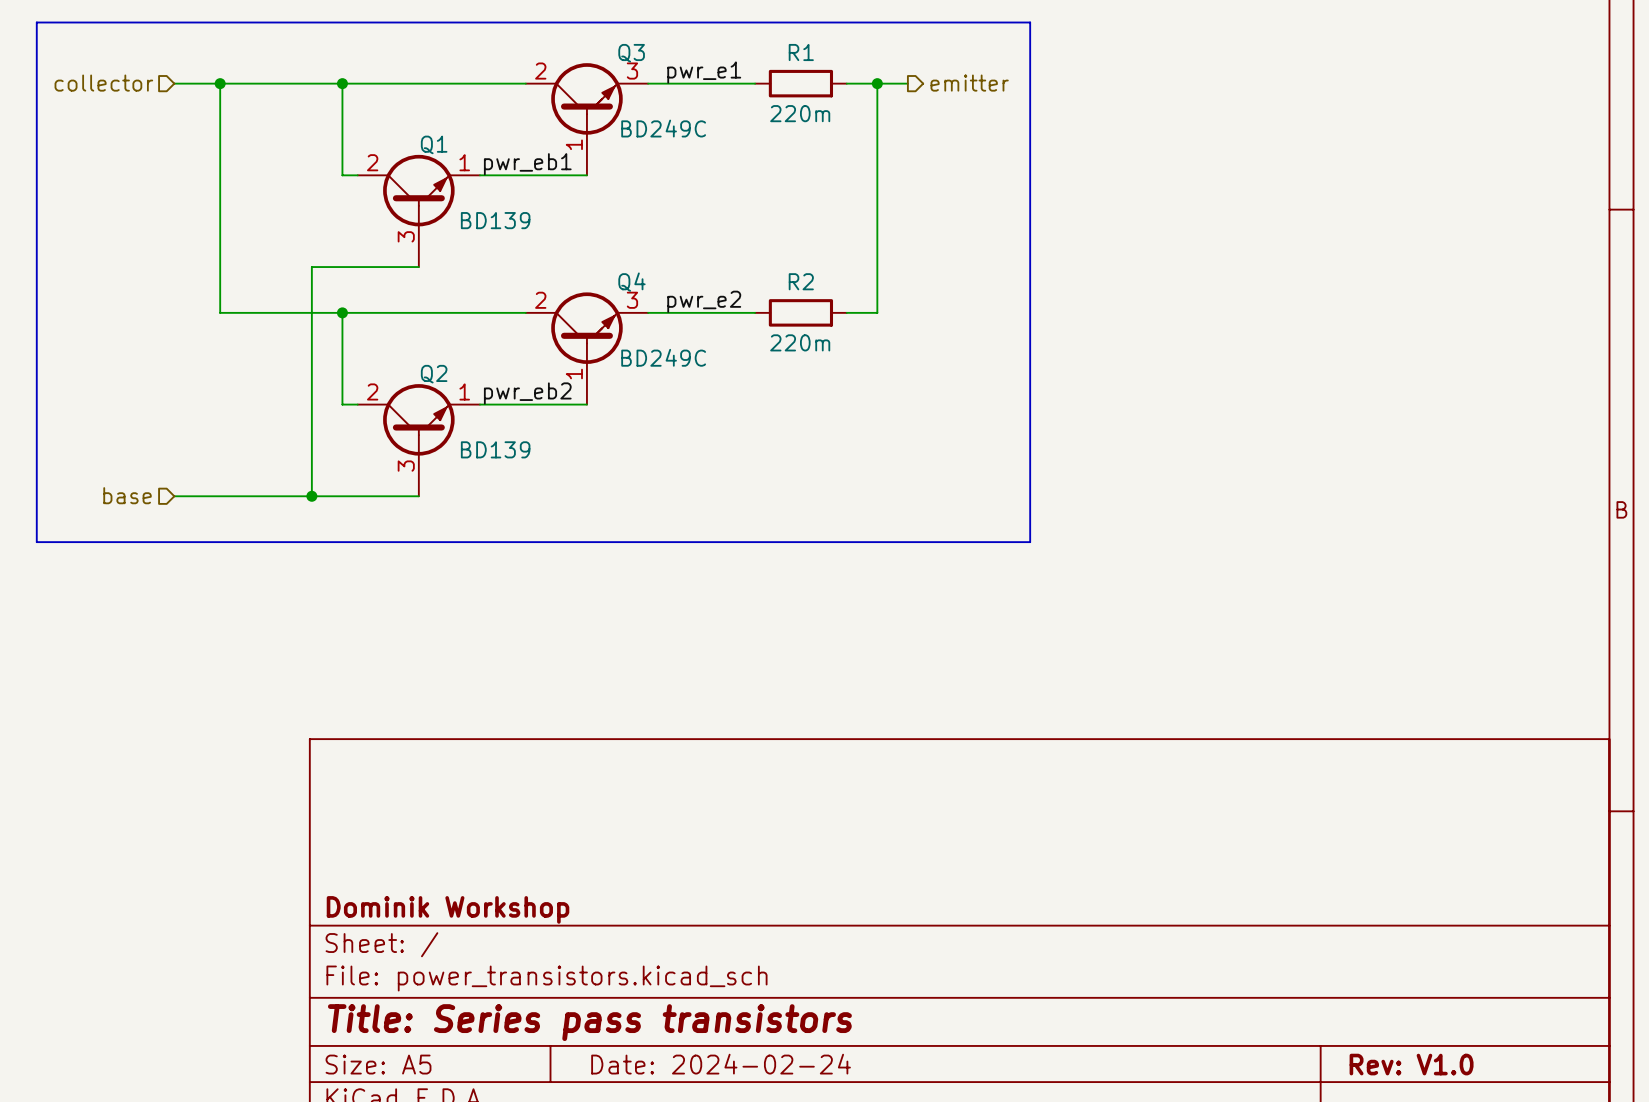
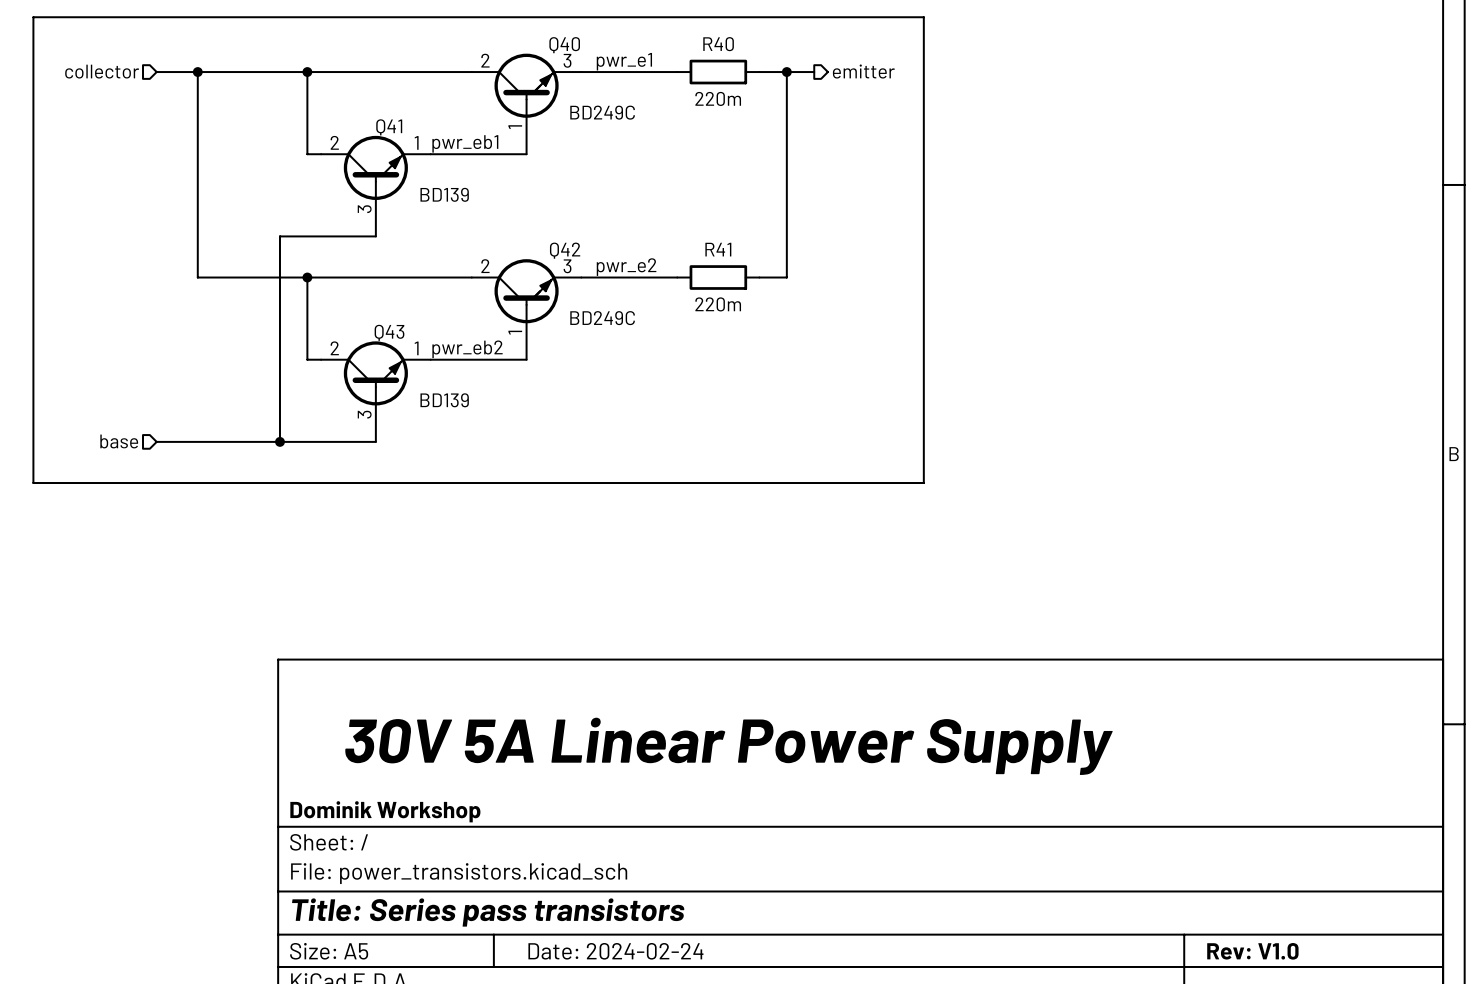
R1 name: R1 (801, 52) -> R40 (718, 44)
Q3 name: Q3 (631, 53) -> Q40 (564, 45)
Q1 name: Q1 (434, 144) -> Q41 (389, 127)
R2 name: R2 (801, 281) -> R41 (718, 249)
Q4 name: Q4 (631, 282) -> Q42 (565, 250)
Q2 name: Q2 (434, 374) -> Q43 (389, 332)
text: none -> 30V 5A Linear Power Supply (728, 746)

